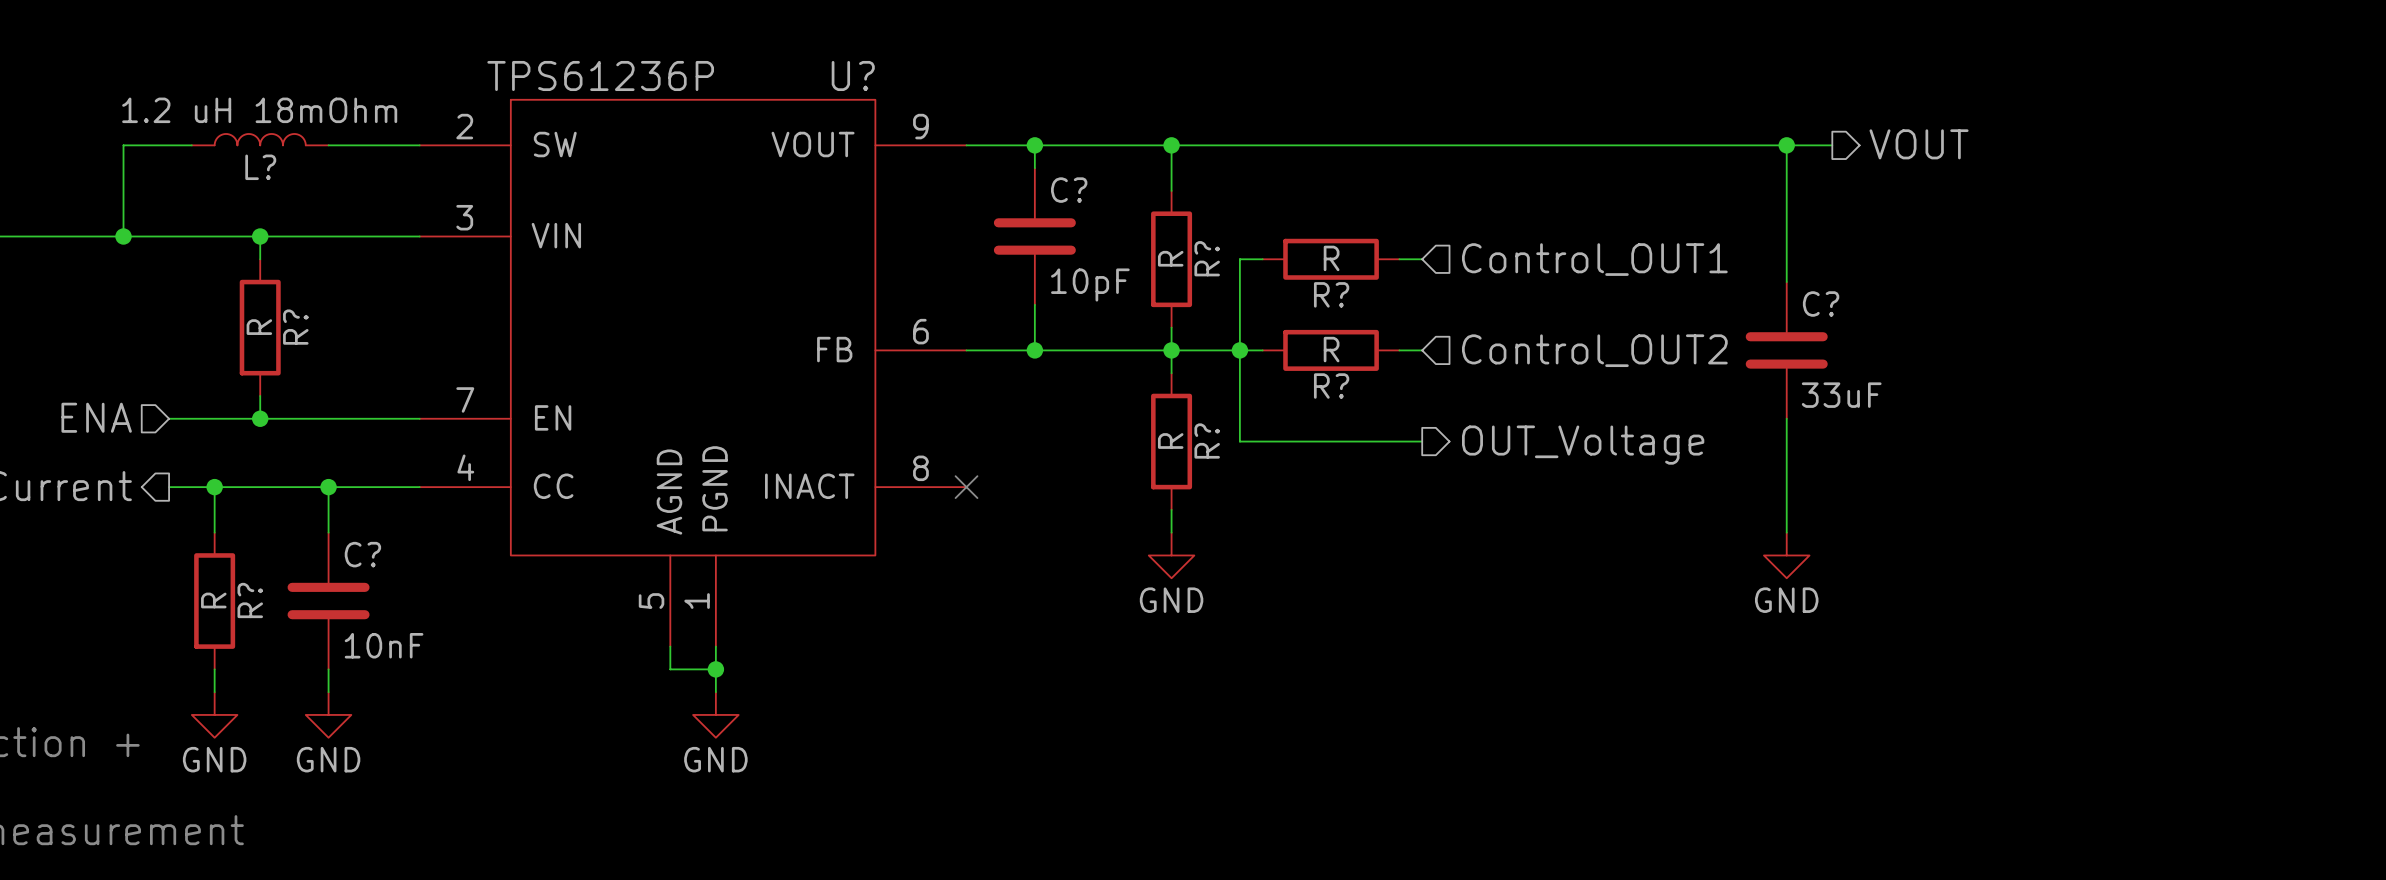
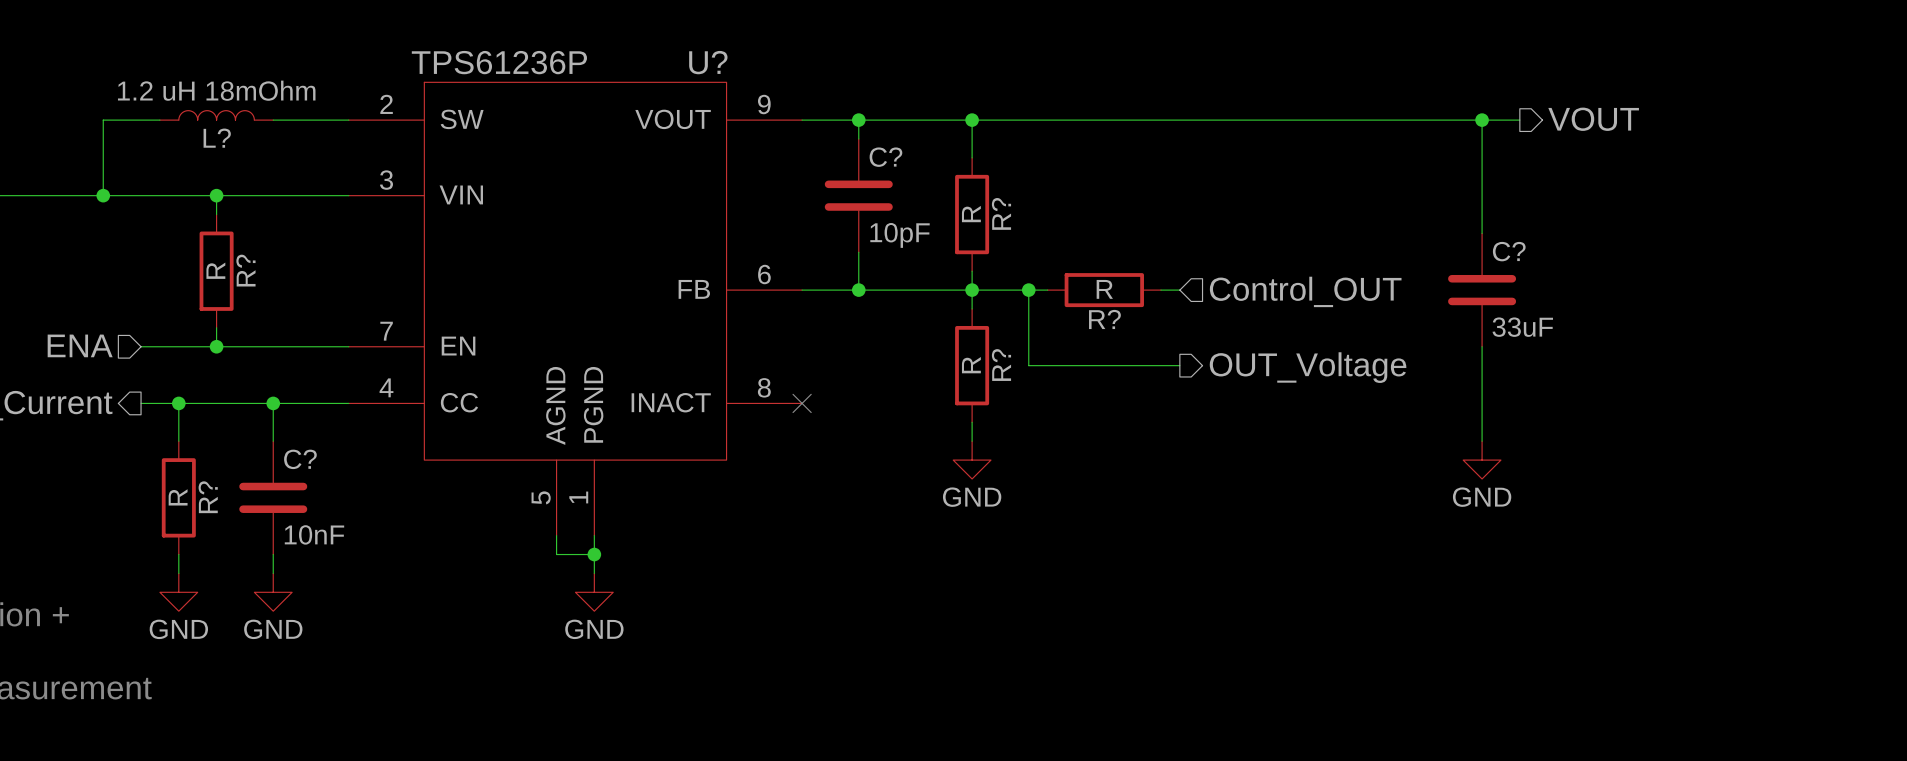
wire: (1262, 259) (1239, 259) (1239, 350) -> none
R?: R (1331, 259) -> none
wire: (1399, 259) (1422, 259) -> none
hierarchical label: Control_OUT1 (1594, 259) -> none
hierarchical label: Control_OUT2 (1594, 350) -> Control_OUT (1305, 291)

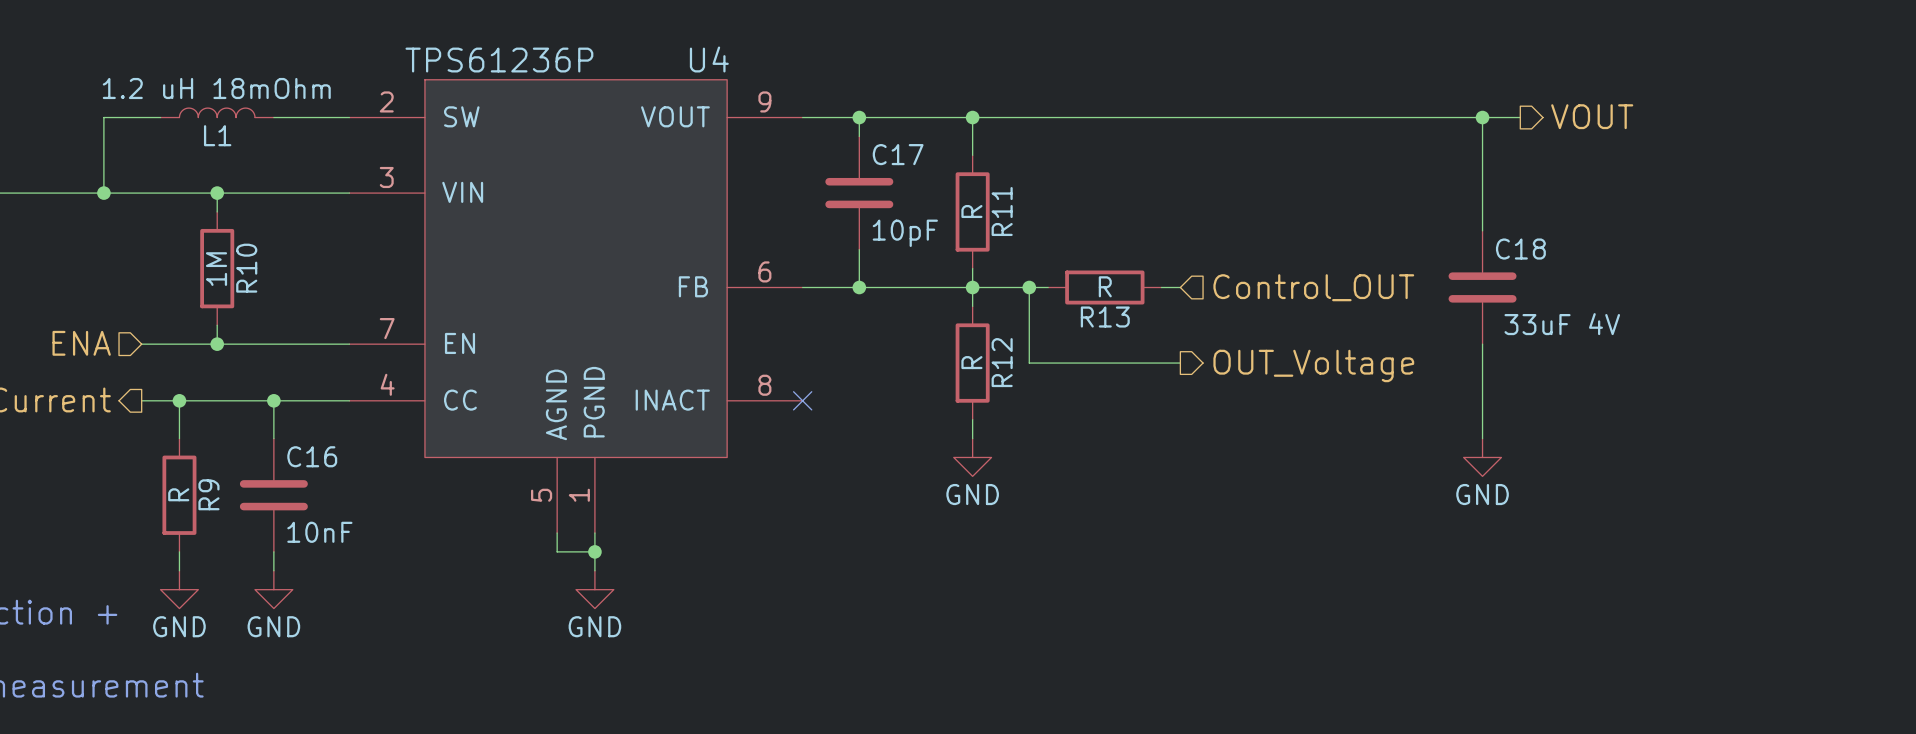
U? name: U? (708, 62) -> U4 (709, 59)
L? name: L? (217, 138) -> L1 (217, 135)
C? name: C? (885, 157) -> C17 (898, 154)
R? name: R? (1001, 213) -> R11 (1002, 211)
C? name: C? (1509, 251) -> C18 (1520, 249)
R? value: R (215, 270) -> 1M (216, 269)
R? name: R? (245, 270) -> R10 (246, 268)
R? name: R? (1104, 319) -> R13 (1105, 317)
C? value: 33uF (1522, 327) -> 33uF 4V (1562, 324)
R? name: R? (1001, 365) -> R12 (1002, 362)
C? name: C? (300, 459) -> C16 (312, 456)
R? name: R? (208, 497) -> R9 (208, 494)

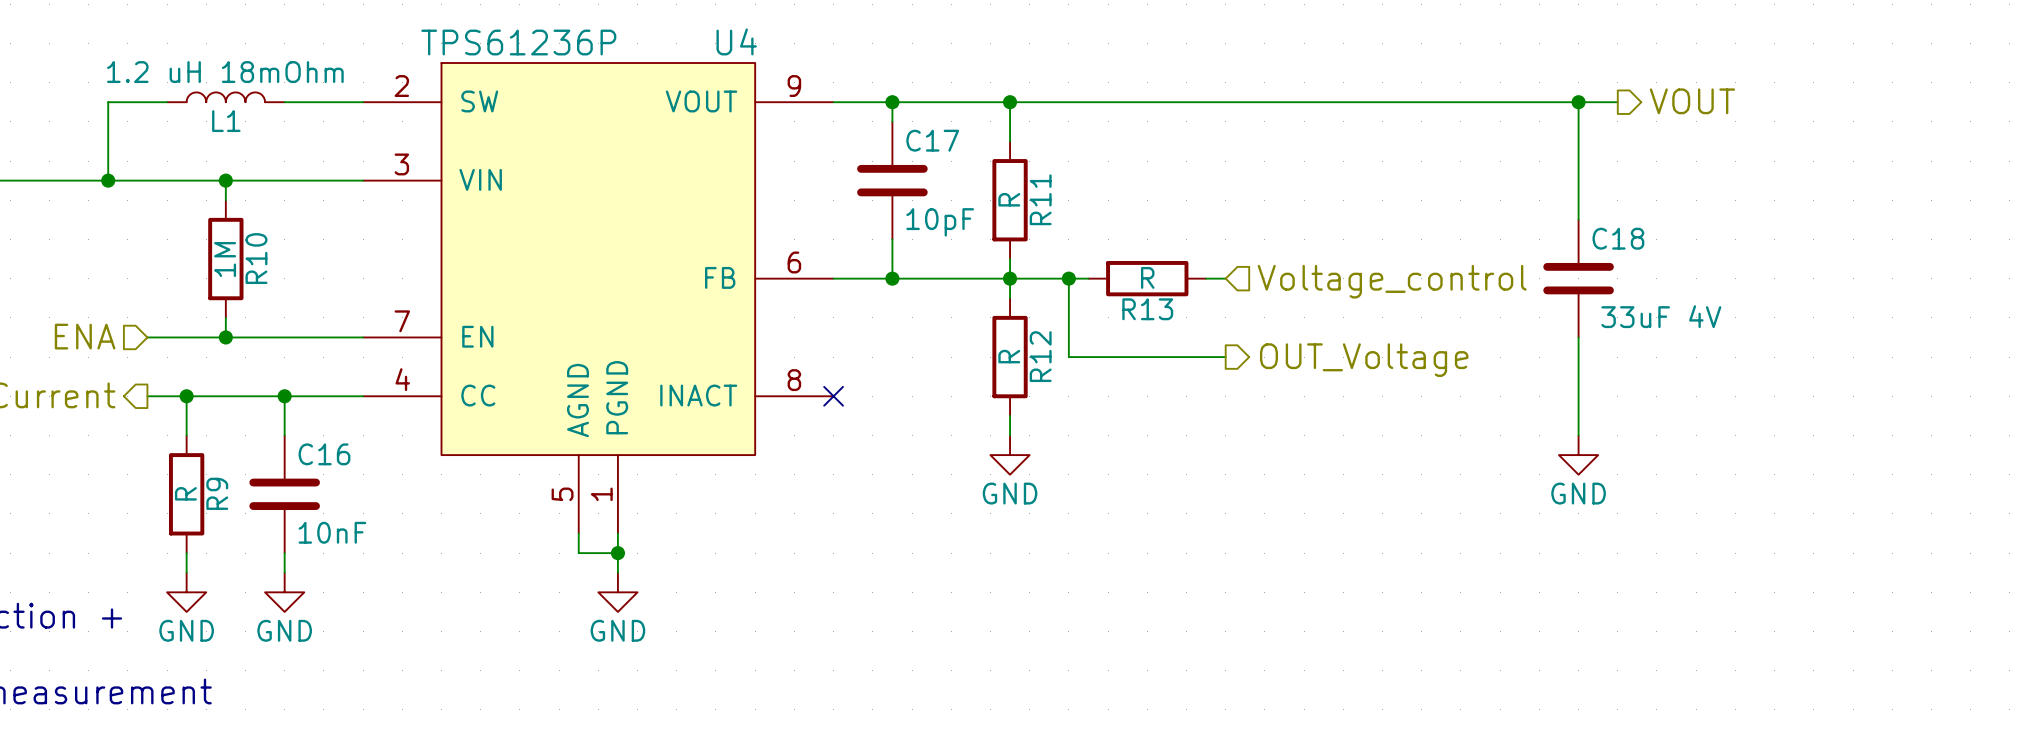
hierarchical label position: VOUT (1592, 116) -> VOUT (1692, 101)
wire: (1482, 117) (1482, 230) -> none
junction position: (1482, 117) -> (1578, 102)
wire: none -> (1617, 102) (1578, 102) (1578, 219)
hierarchical label: Control_OUT (1313, 287) -> Voltage_control (1392, 281)
C18 position: (1482, 287) -> (1578, 278)
wire: (1482, 344) (1482, 438) -> (1578, 337) (1578, 435)
power symbol position: GND (1482, 457) -> GND (1578, 455)

